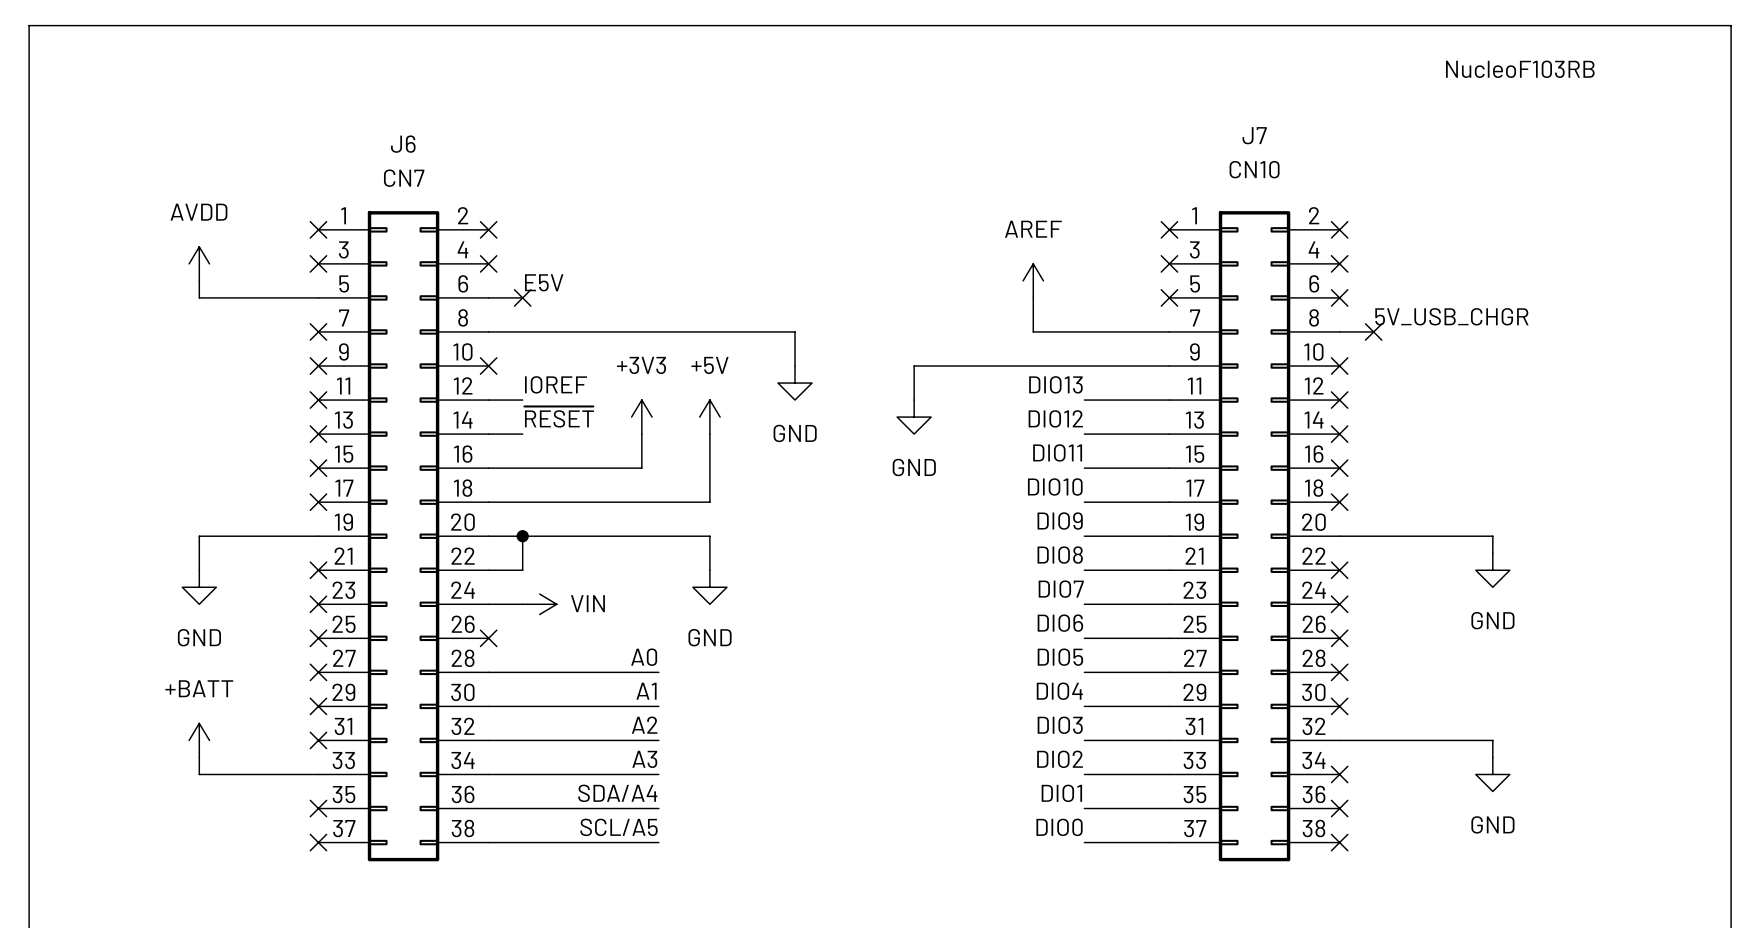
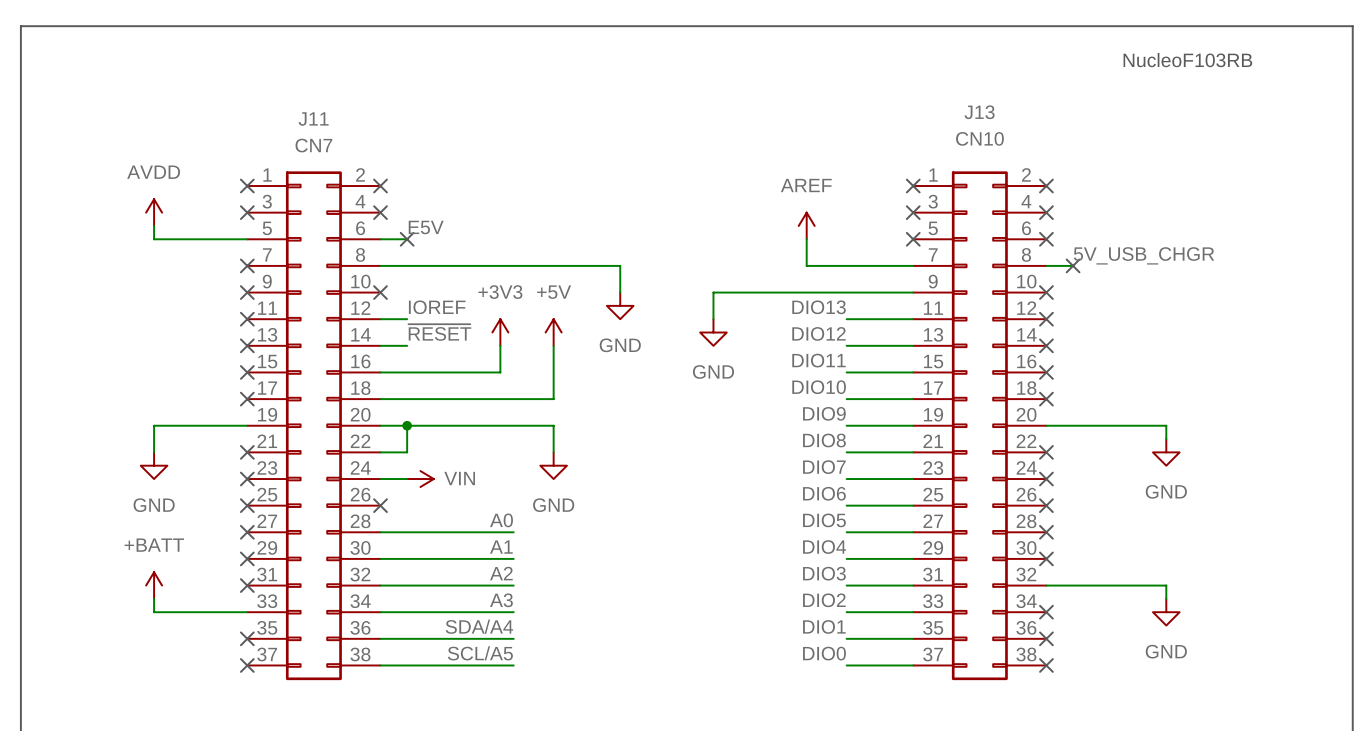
J7 name: J7 (1254, 135) -> J13 (979, 112)
J6 name: J6 (403, 144) -> J11 (313, 119)

